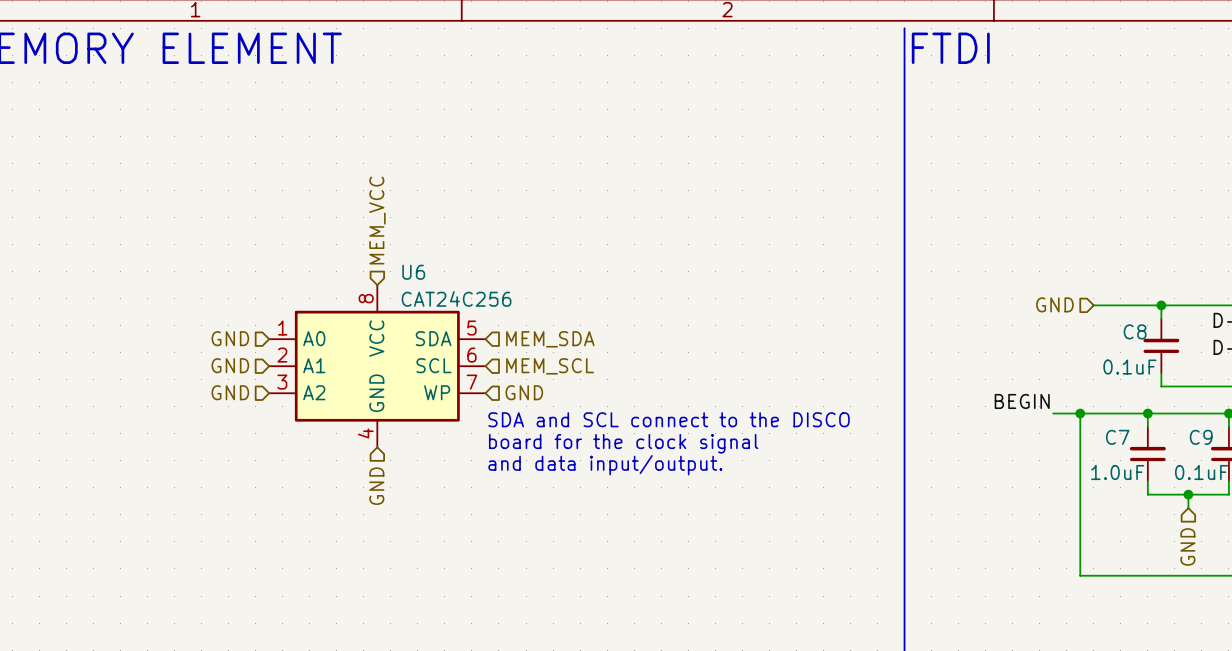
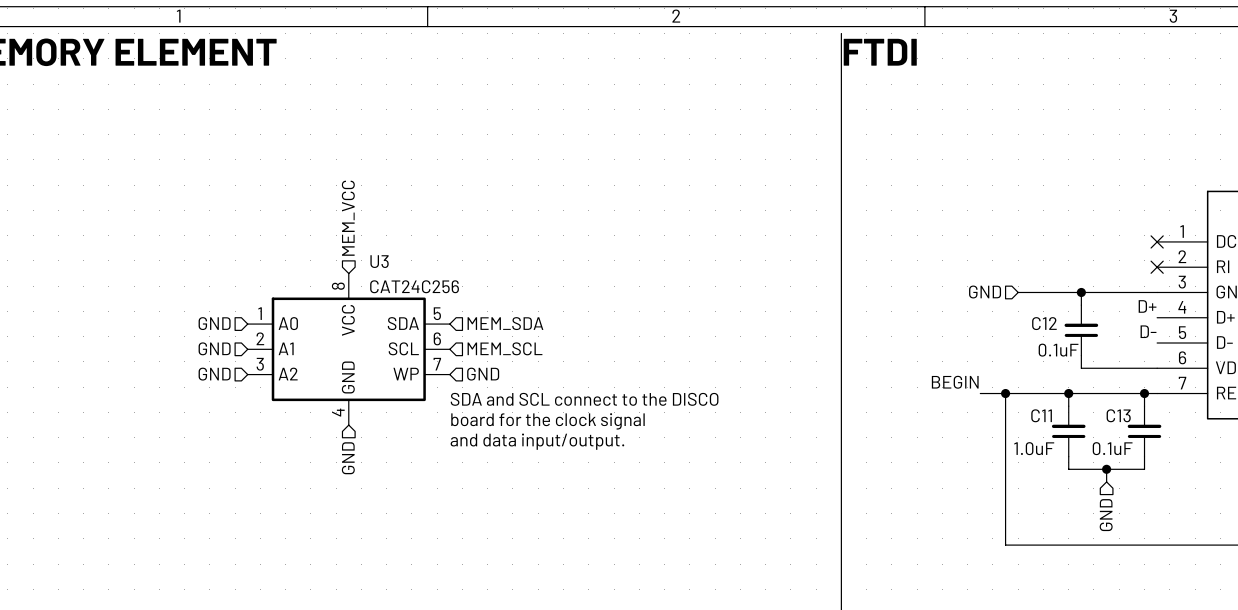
U6 name: U6 (413, 272) -> U3 (379, 261)
C8 name: C8 (1135, 331) -> C12 (1044, 323)
C7 name: C7 (1117, 437) -> C11 (1041, 415)
C9 name: C9 (1201, 437) -> C13 (1118, 415)

